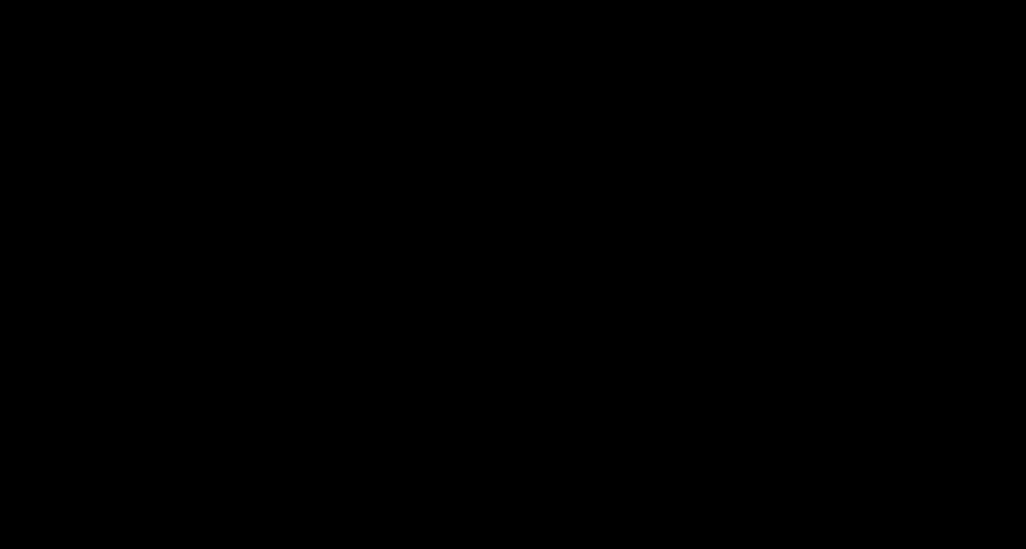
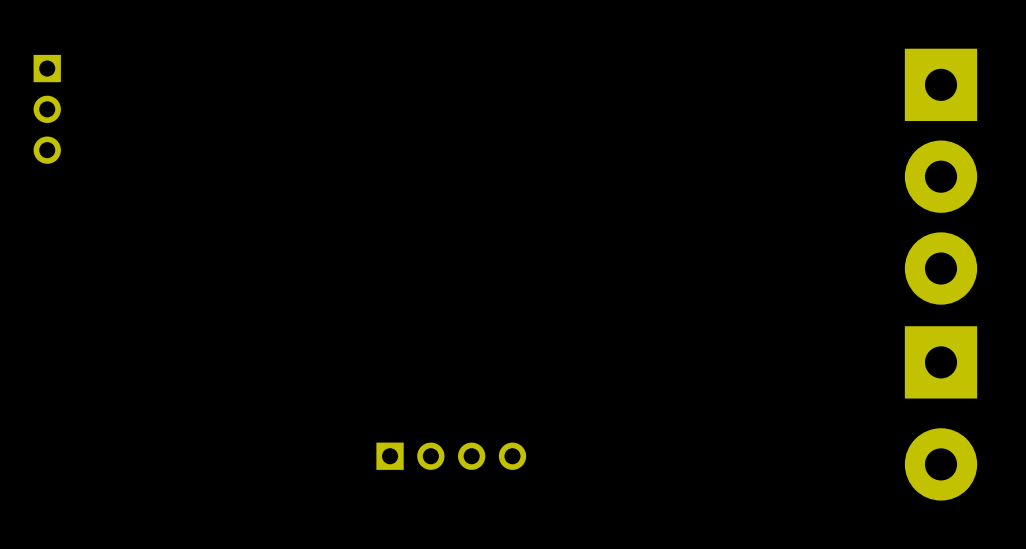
part: none -> (47, 109)
part: none -> (941, 176)
part: none -> (941, 413)
part: none -> (451, 456)

